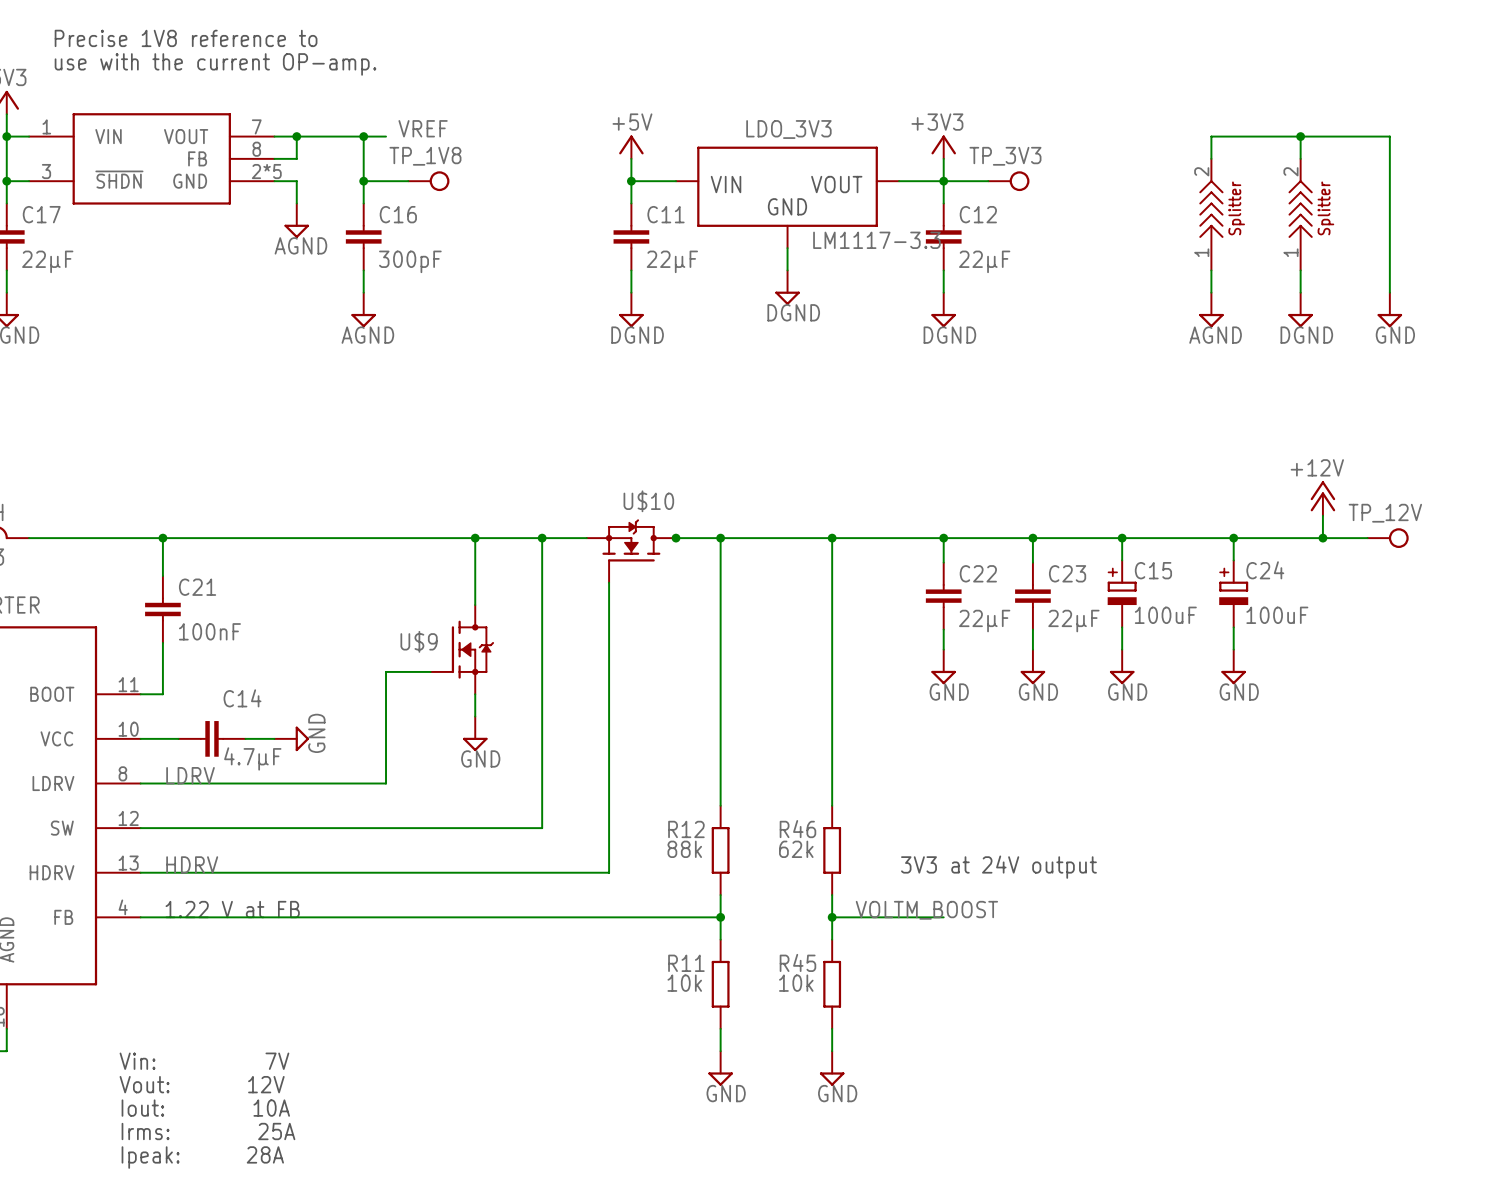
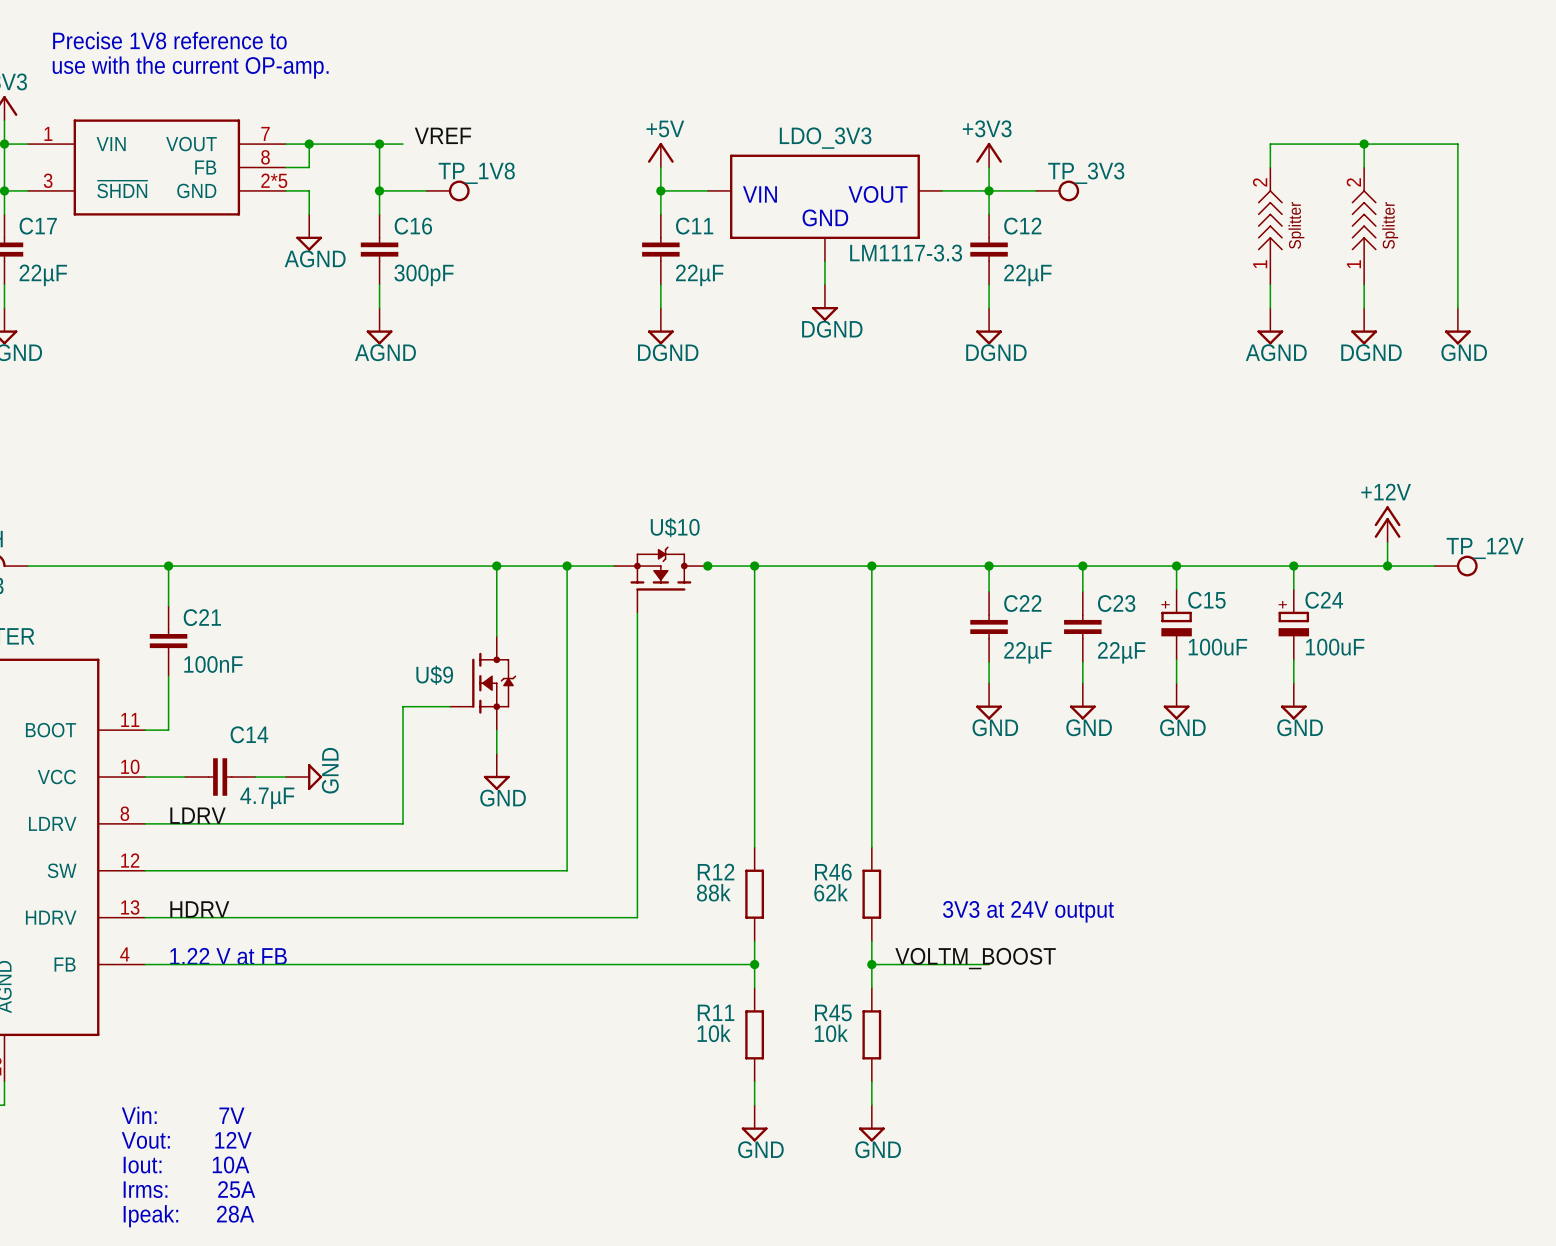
TP_1V8 name position: TP_1V8 (425, 156) -> TP_1V8 (476, 173)
TP_3V3 name position: TP_3V3 (1005, 156) -> TP_3V3 (1086, 173)
TP_12V name position: TP_12V (1385, 513) -> TP_12V (1485, 548)

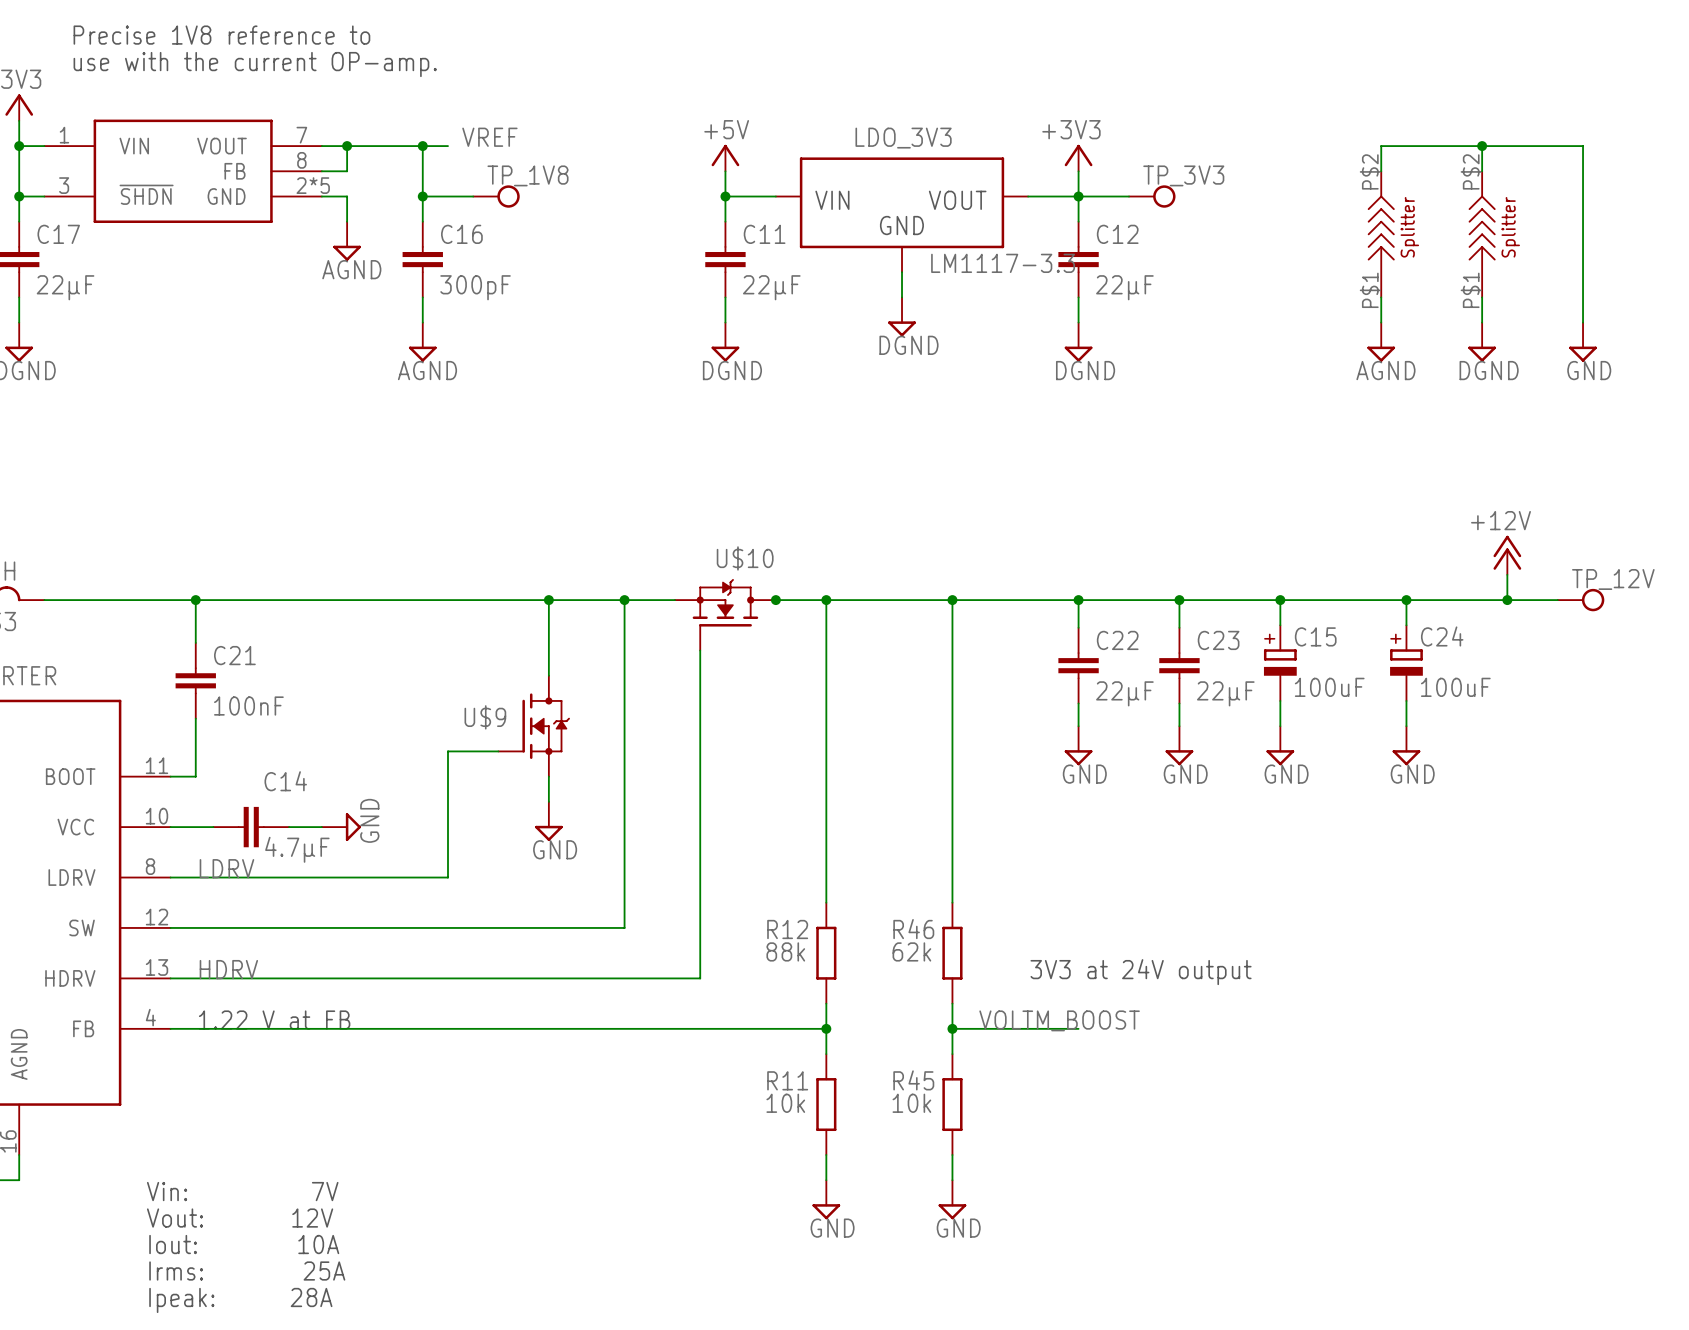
part pin number: 2 (1260, 182) -> P$2 (1370, 171)
part pin number: 2 (1353, 182) -> P$2 (1471, 171)
part pin number: 1 (1260, 264) -> P$1 (1370, 290)
part pin number: 1 (1353, 264) -> P$1 (1471, 290)

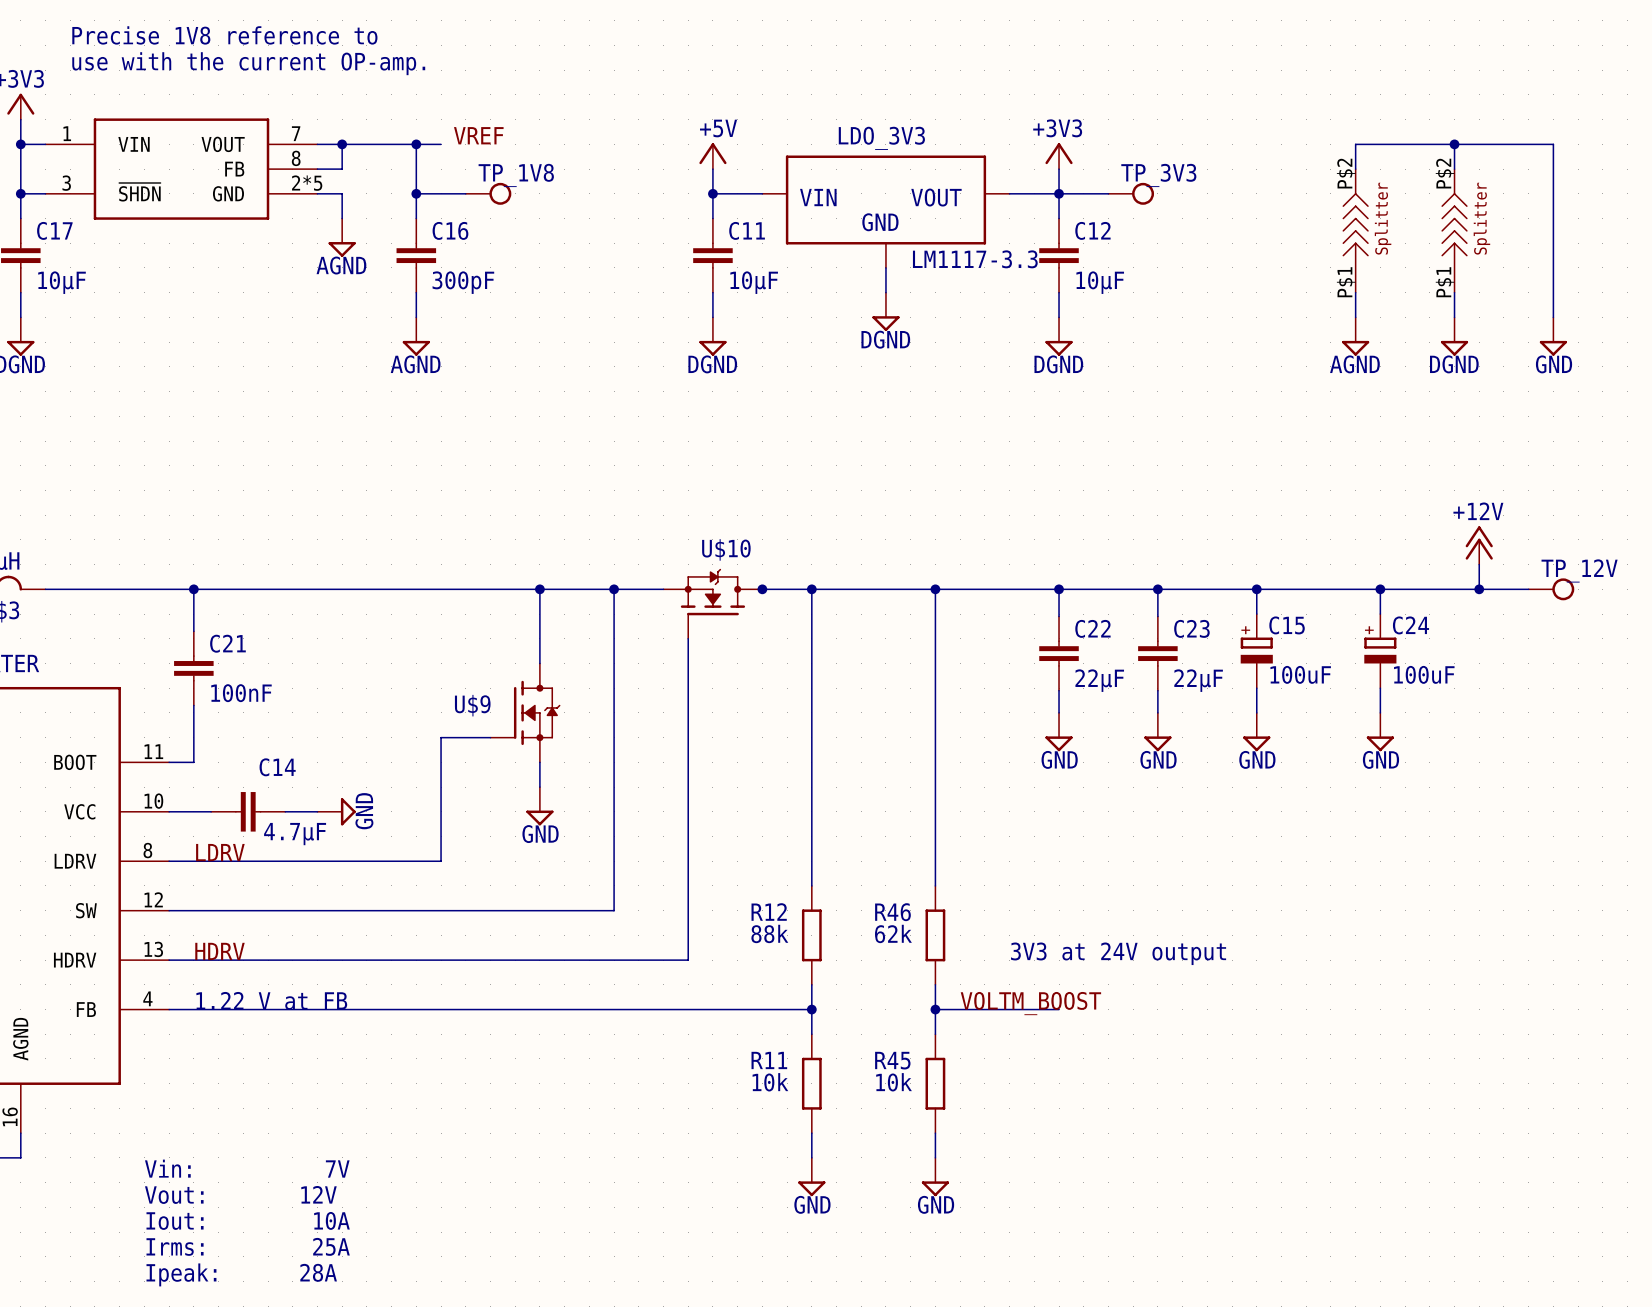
C17 value: 22µF (65, 287) -> 10µF (62, 282)
C11 value: 22µF (771, 287) -> 10µF (754, 282)
C12 value: 22µF (1124, 287) -> 10µF (1100, 282)

